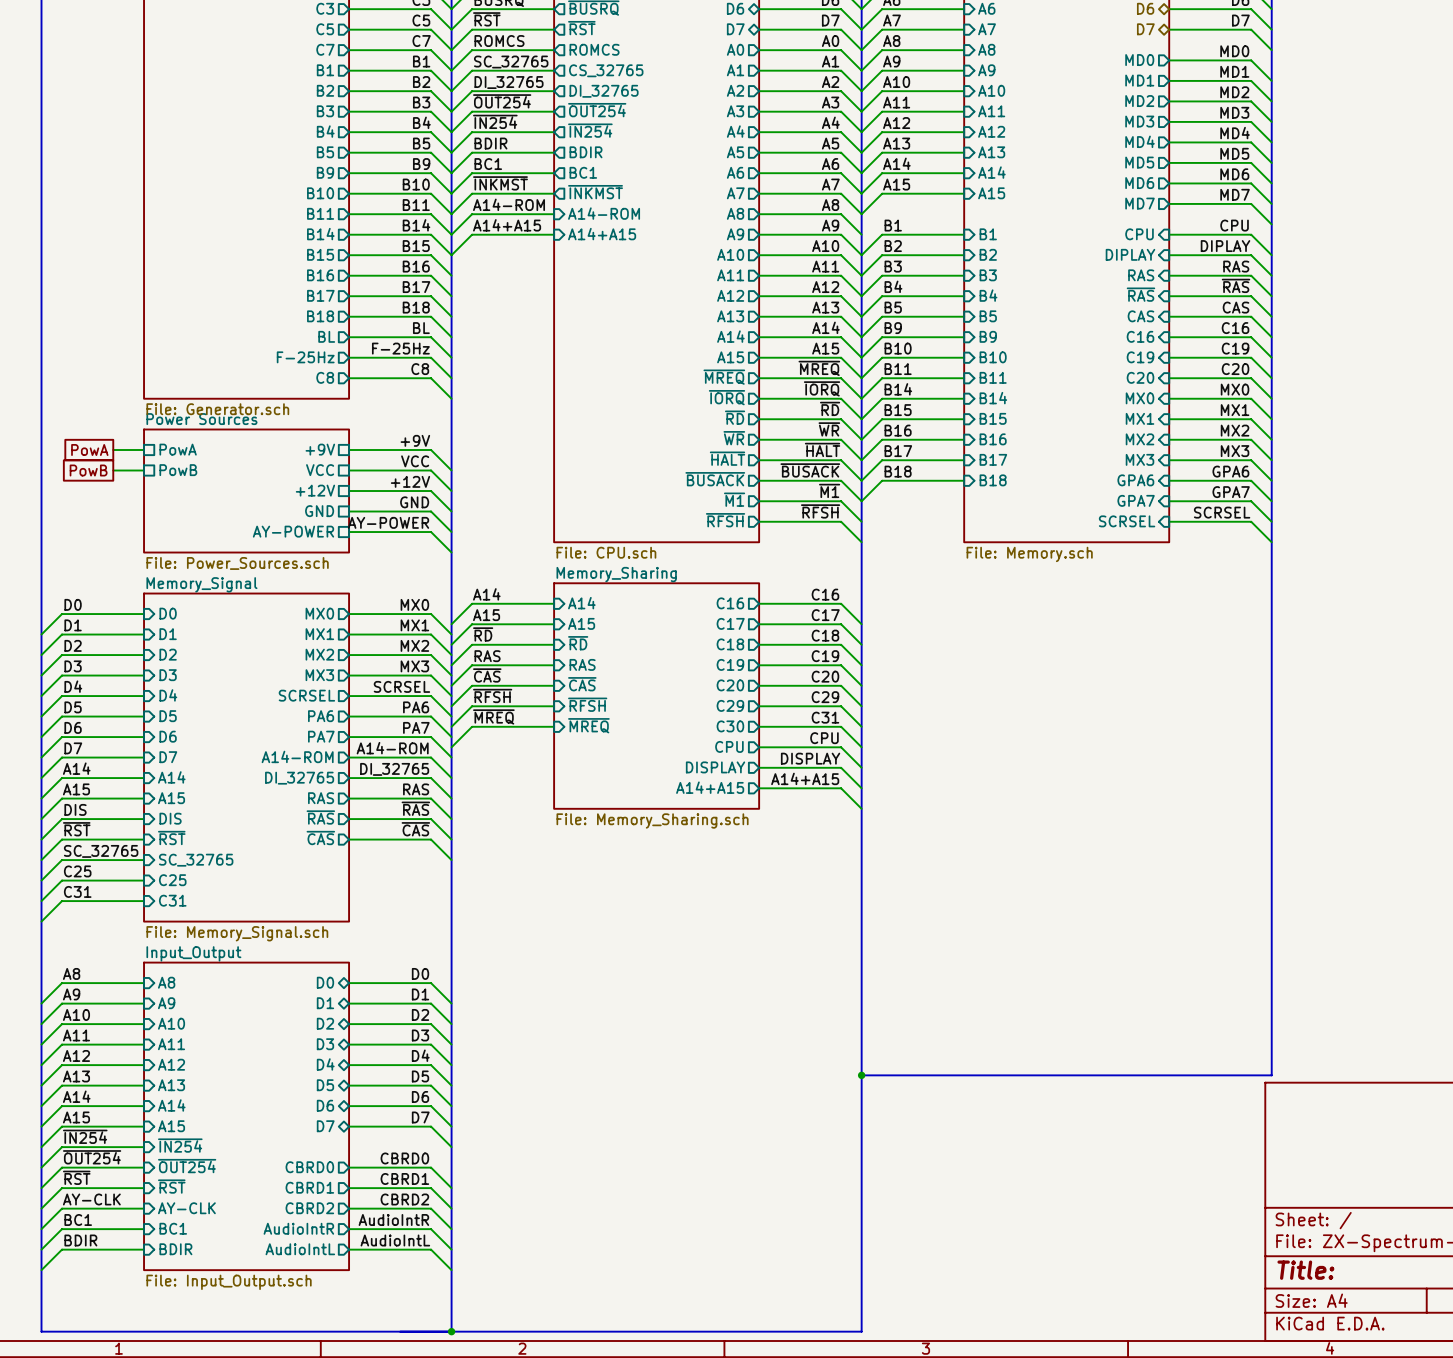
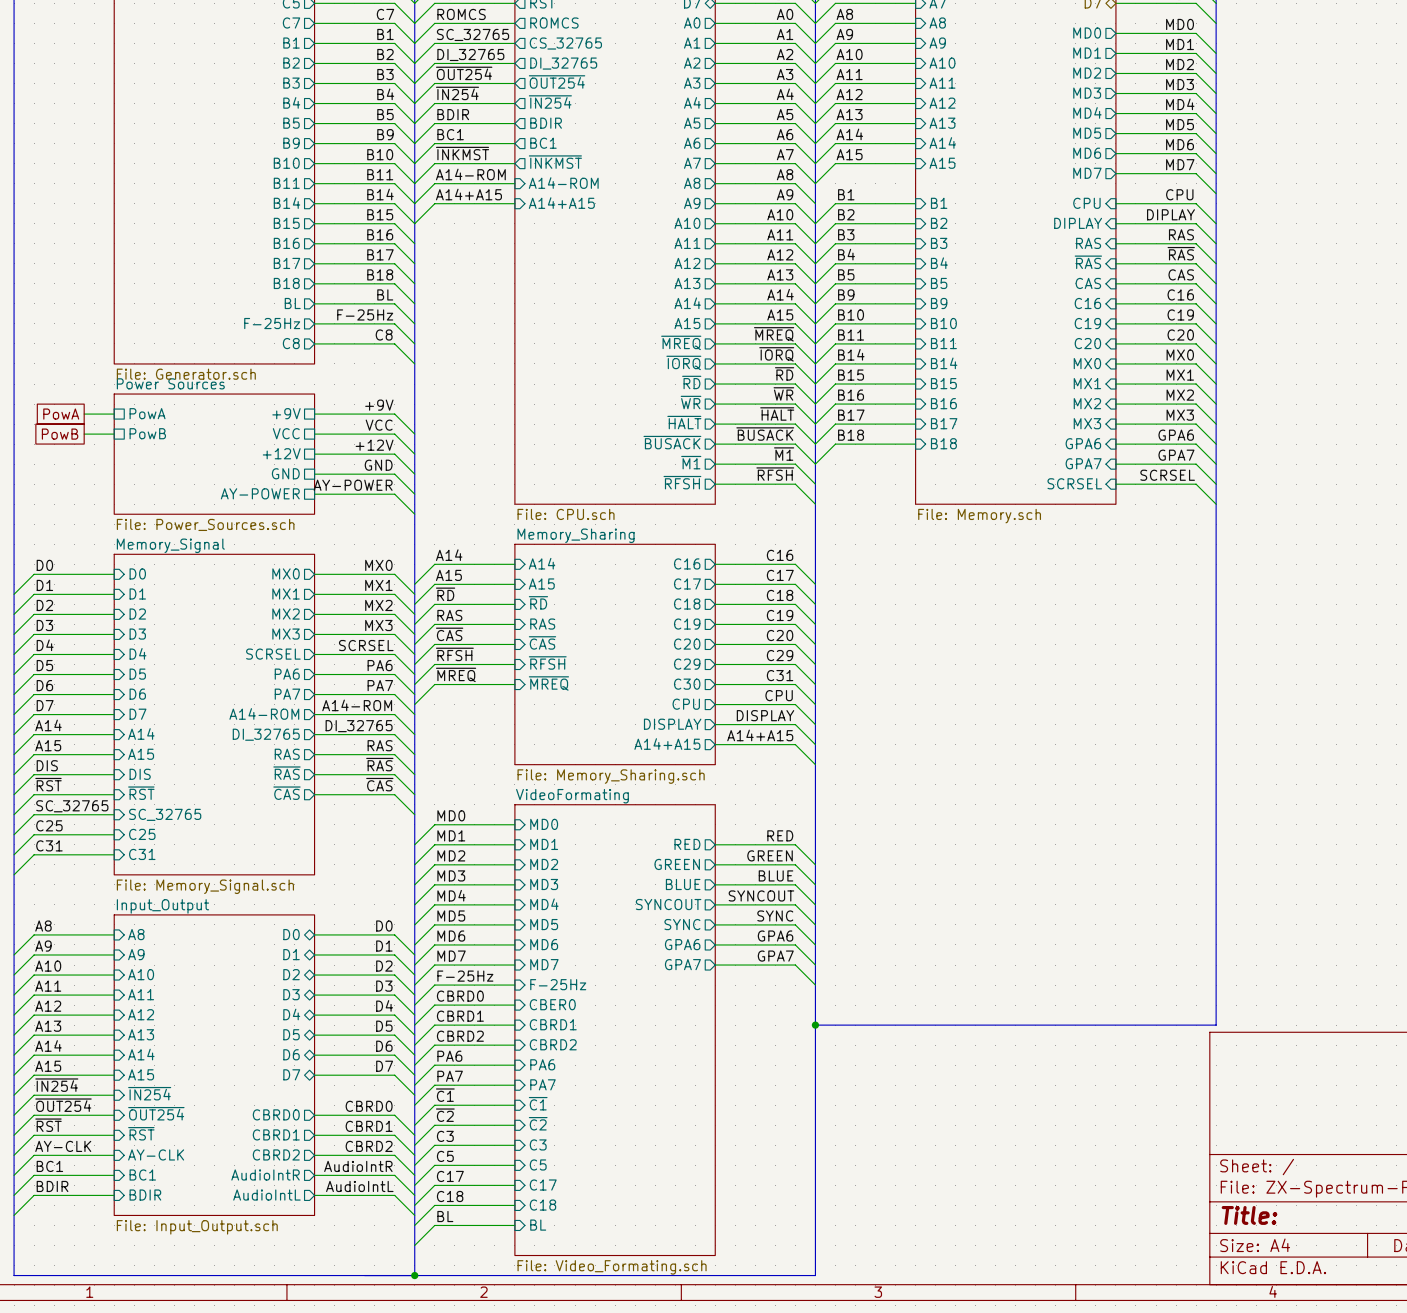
label: none -> MD0 (451, 815)
sheet pin: none -> MD0 (544, 824)
wire: none -> (514, 824) (434, 824) (414, 844)
label: none -> MD1 (451, 835)
label: none -> RED (780, 835)
wire: none -> (514, 844) (434, 844) (414, 864)
sheet pin: none -> MD1 (544, 844)
sheet pin: none -> RED (687, 844)
wire: none -> (715, 844) (795, 844) (815, 864)
label: none -> MD2 (451, 855)
label: none -> GREEN (770, 855)
sheet pin: none -> MD2 (544, 864)
sheet pin: none -> GREEN (677, 864)
wire: none -> (514, 864) (434, 864) (414, 884)
wire: none -> (715, 864) (795, 864) (815, 884)
label: none -> MD3 (451, 875)
label: none -> BLUE (776, 875)
wire: none -> (514, 884) (434, 884) (414, 904)
sheet pin: none -> MD3 (544, 884)
sheet pin: none -> BLUE (683, 884)
wire: none -> (715, 884) (795, 884) (815, 904)
label: none -> MD4 (451, 895)
label: none -> SYNCOUT (761, 895)
sheet pin: none -> MD4 (544, 904)
sheet pin: none -> SYNCOUT (668, 904)
wire: none -> (514, 904) (434, 904) (414, 924)
wire: none -> (715, 904) (795, 904) (815, 924)
label: none -> MD5 (451, 916)
label: none -> SYNC (775, 916)
wire: none -> (514, 924) (434, 924) (414, 944)
sheet pin: none -> MD5 (544, 924)
sheet pin: none -> SYNC (682, 924)
wire: none -> (715, 924) (795, 924) (815, 944)
label: none -> MD6 (451, 936)
label: none -> GPA6 (775, 936)
sheet pin: none -> MD6 (544, 944)
sheet pin: none -> GPA6 (682, 944)
wire: none -> (514, 944) (434, 944) (414, 965)
wire: none -> (715, 944) (795, 944) (815, 965)
label: none -> MD7 (451, 956)
label: none -> GPA7 (775, 956)
wire: none -> (514, 965) (434, 965) (414, 985)
sheet pin: none -> MD7 (544, 964)
sheet pin: none -> GPA7 (682, 964)
wire: none -> (715, 965) (795, 965) (815, 985)
label: none -> F-25Hz (465, 976)
sheet pin: none -> F-25Hz (558, 984)
wire: none -> (514, 985) (434, 985) (414, 1005)
label: none -> CBRD0 (460, 996)
wire: none -> (514, 1005) (434, 1005) (414, 1025)
sheet pin: none -> CBER0 (552, 1004)
label: none -> CBRD1 (460, 1016)
sheet pin: none -> CBRD1 (553, 1024)
wire: none -> (514, 1025) (434, 1025) (414, 1045)
sheet VideoFormating: none -> File: Video_Formating.sch (615, 1030)
label: none -> CBRD2 (460, 1036)
wire: none -> (514, 1045) (434, 1045) (414, 1065)
sheet pin: none -> CBRD2 (553, 1044)
label: none -> PA6 (449, 1056)
sheet pin: none -> PA6 (542, 1064)
wire: none -> (514, 1065) (434, 1065) (414, 1085)
label: none -> PA7 (450, 1076)
wire: none -> (514, 1085) (434, 1085) (414, 1105)
sheet pin: none -> PA7 (542, 1084)
label: none -> ~{C1} (445, 1095)
sheet pin: none -> ~{C1} (538, 1103)
wire: none -> (514, 1105) (434, 1105) (414, 1125)
label: none -> ~{C2} (445, 1115)
sheet pin: none -> ~{C2} (538, 1123)
wire: none -> (514, 1125) (434, 1125) (414, 1145)
label: none -> C3 (445, 1136)
wire: none -> (514, 1145) (434, 1145) (414, 1165)
sheet pin: none -> C3 (538, 1144)
label: none -> C5 (445, 1156)
wire: none -> (514, 1165) (434, 1165) (414, 1185)
sheet pin: none -> C5 (538, 1164)
label: none -> C17 (450, 1176)
wire: none -> (514, 1185) (434, 1185) (414, 1205)
sheet pin: none -> C17 (543, 1185)
label: none -> C18 (450, 1196)
wire: none -> (514, 1205) (434, 1205) (414, 1225)
sheet pin: none -> C18 (542, 1205)
label: none -> BL (445, 1216)
wire: none -> (514, 1225) (434, 1225) (414, 1245)
sheet pin: none -> BL (538, 1225)

